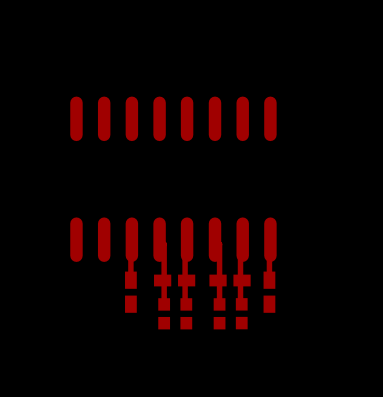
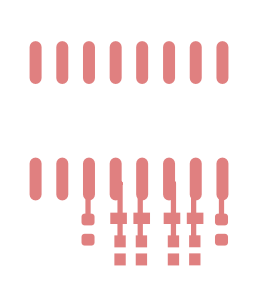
part footprint: [125, 271, 137, 313] -> [81, 213, 95, 246]
part footprint: [263, 271, 276, 313] -> [214, 213, 229, 246]

